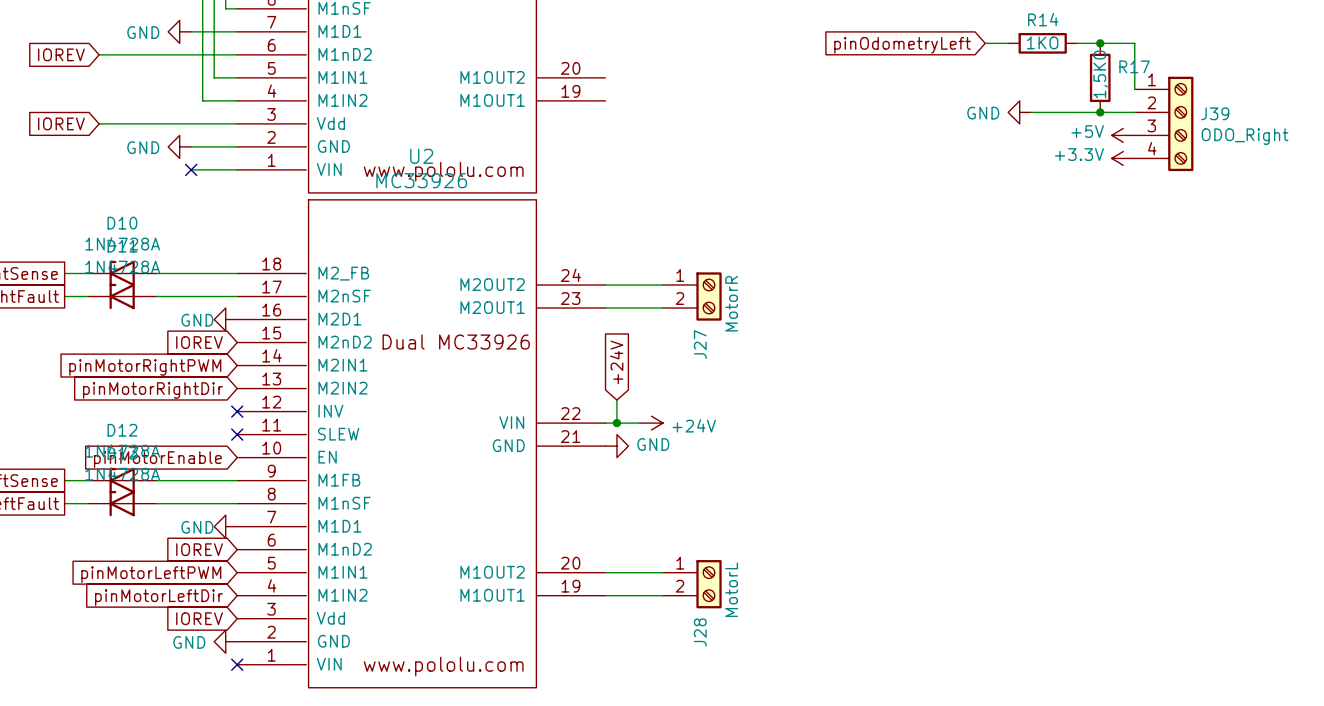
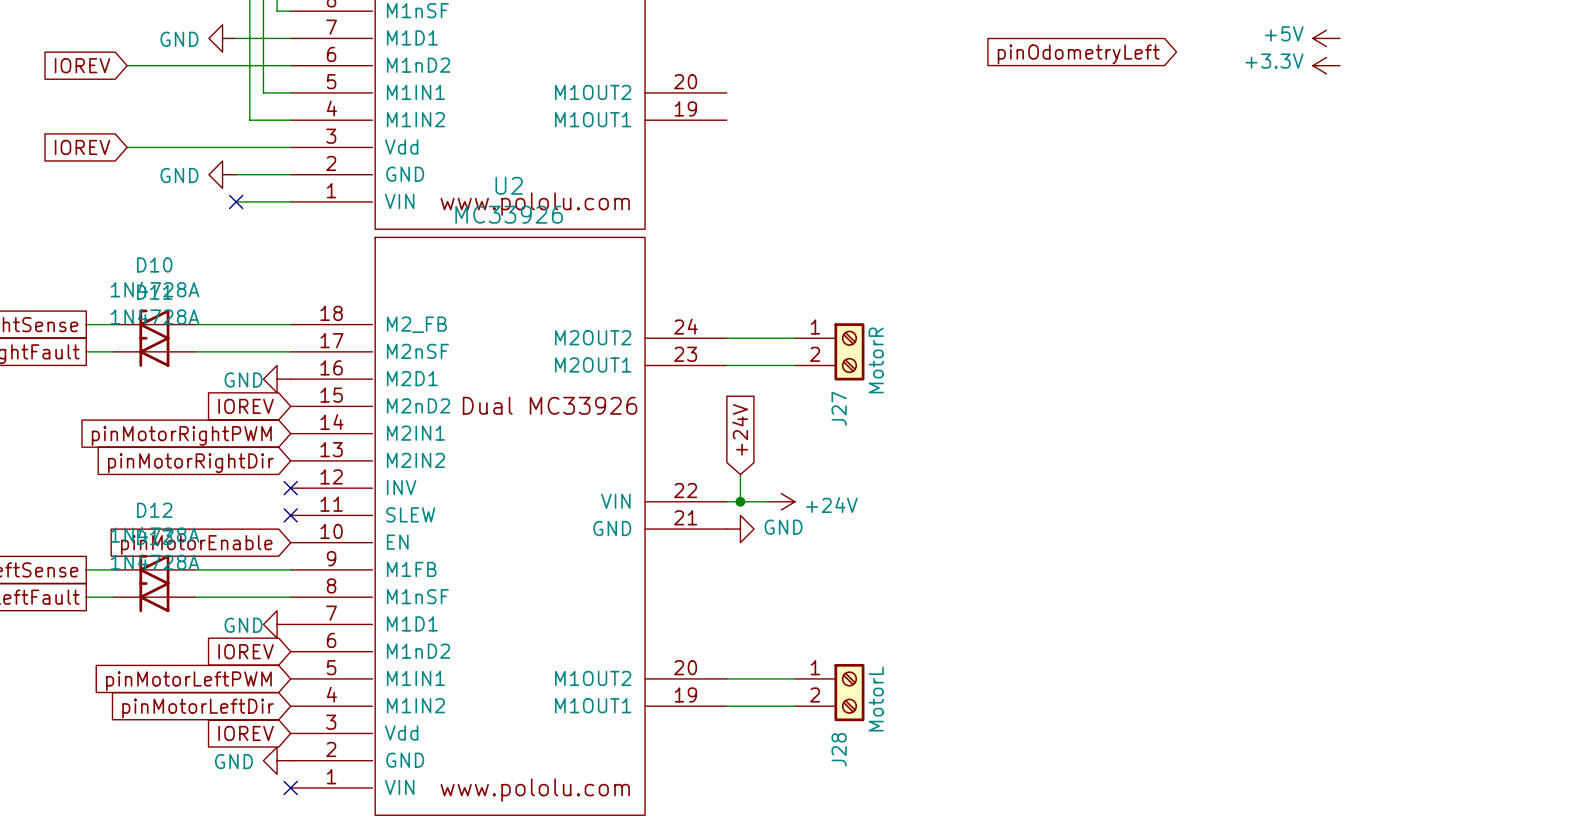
power symbol: none -> +5V (1326, 38)
wire: (985, 43) (1008, 43) -> none
R14: 1KO (1042, 43) -> none
wire: (1077, 43) (1134, 43) (1134, 89) -> none
junction: (1100, 43) -> none
power symbol: none -> +3.3V (1326, 65)
R17: 1,5KO (1100, 77) -> none
power symbol: GND (1019, 112) -> none
wire: (1031, 112) (1134, 112) -> none
junction: (1100, 112) -> none
J39: ODO_Right (1164, 123) -> none
power symbol: +5V (1123, 135) -> none
power symbol: +3.3V (1123, 158) -> none

